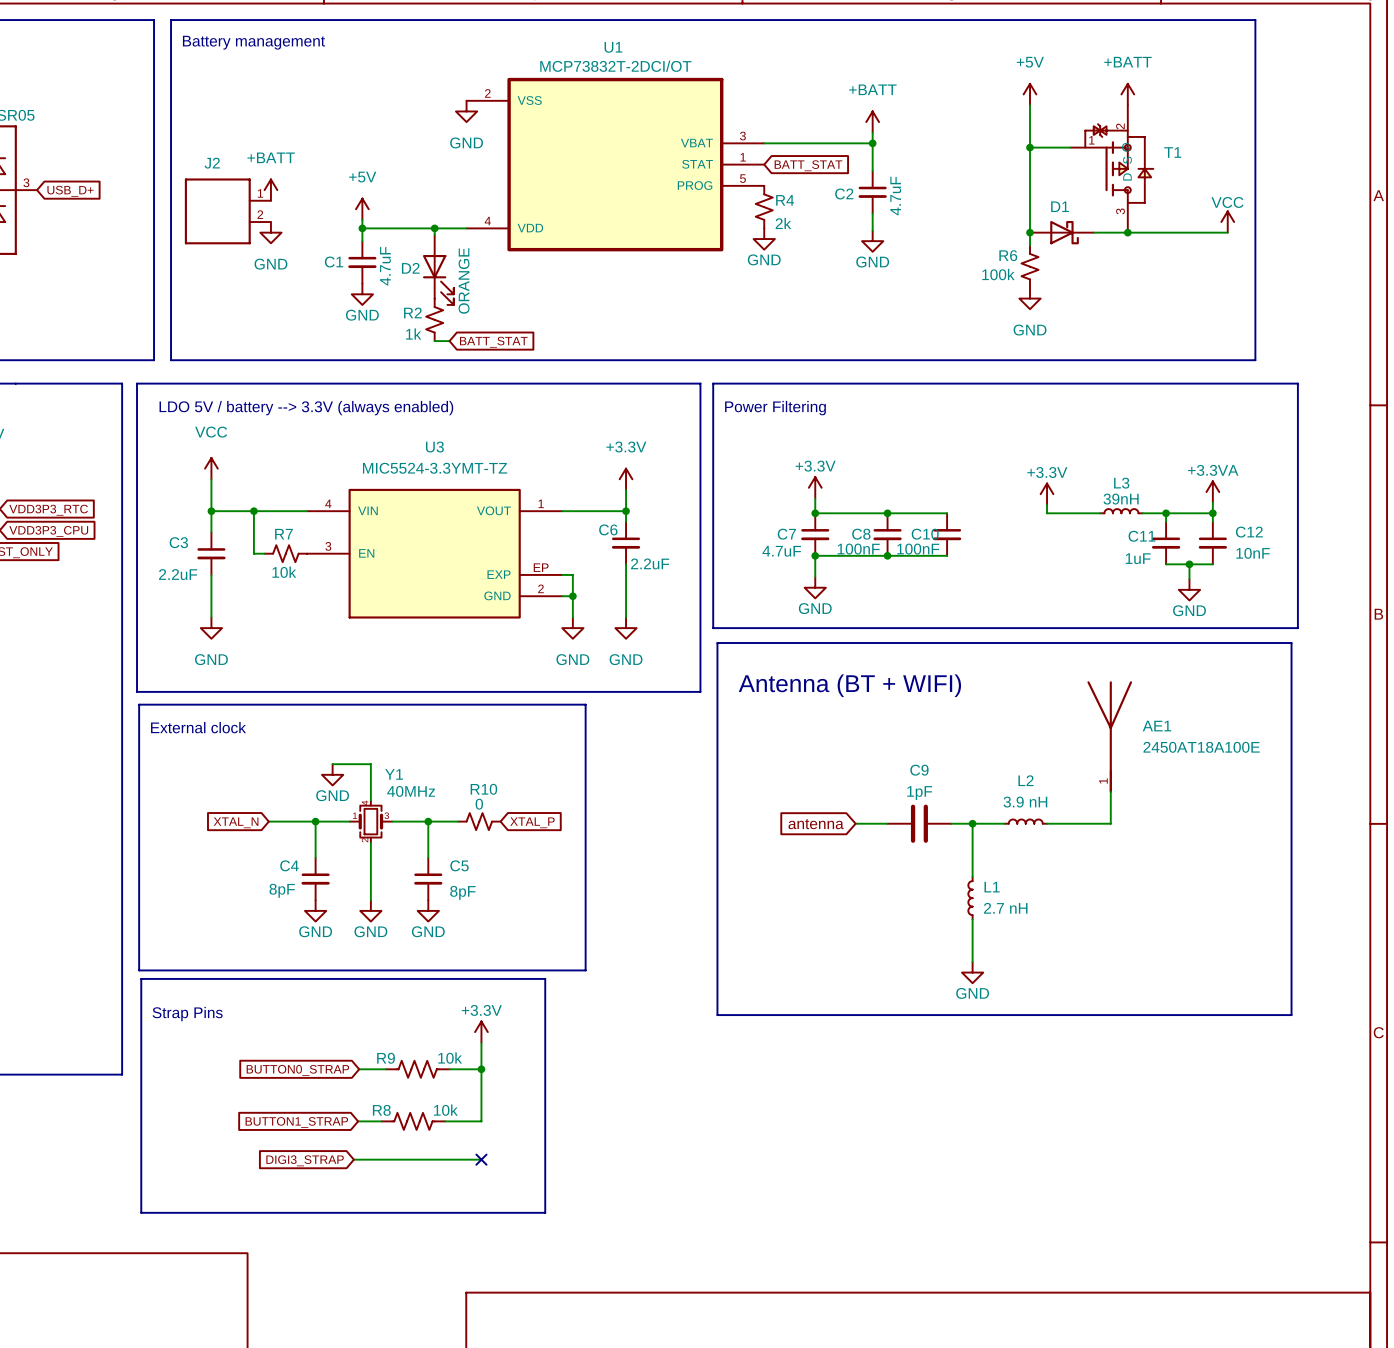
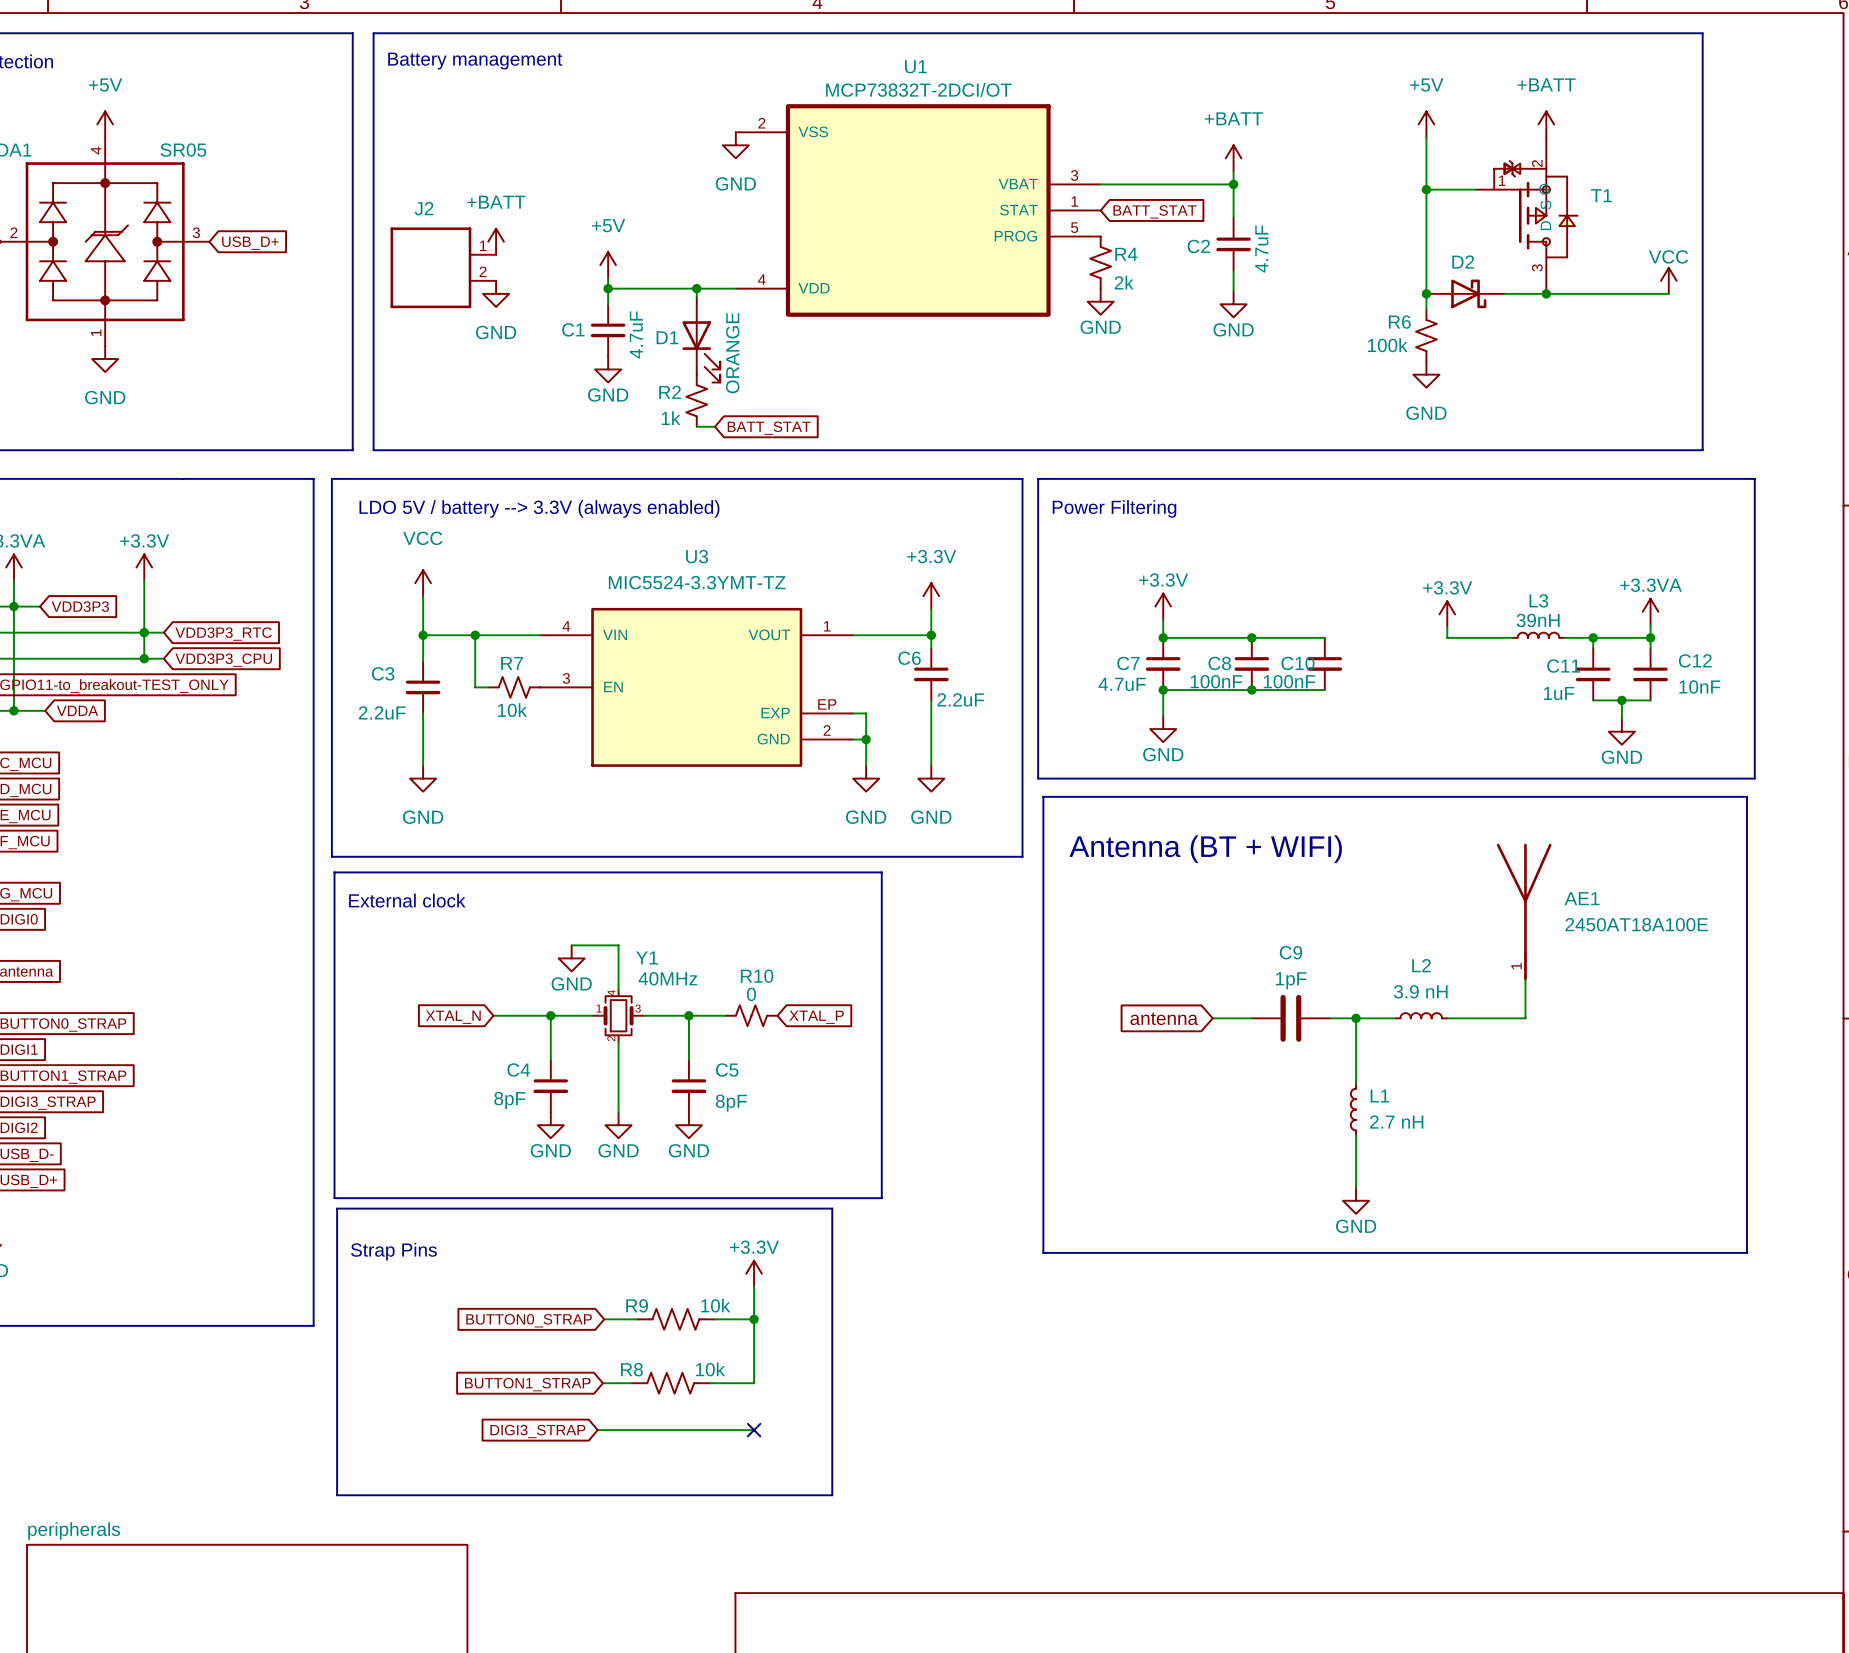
D1 name: D1 (1060, 206) -> D2 (1463, 262)
D2 name: D2 (410, 268) -> D1 (667, 337)

